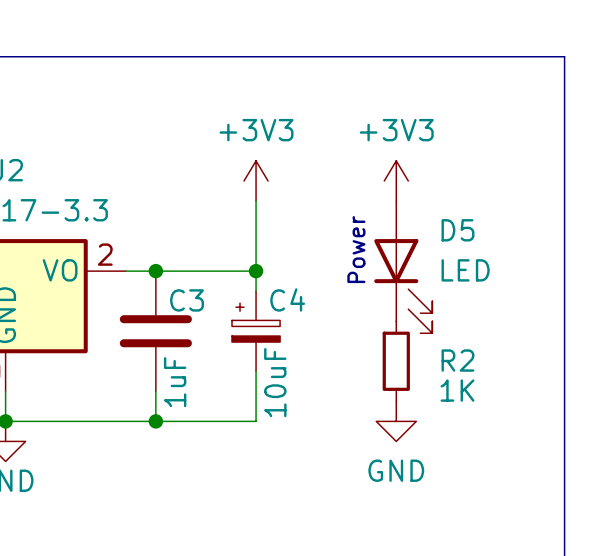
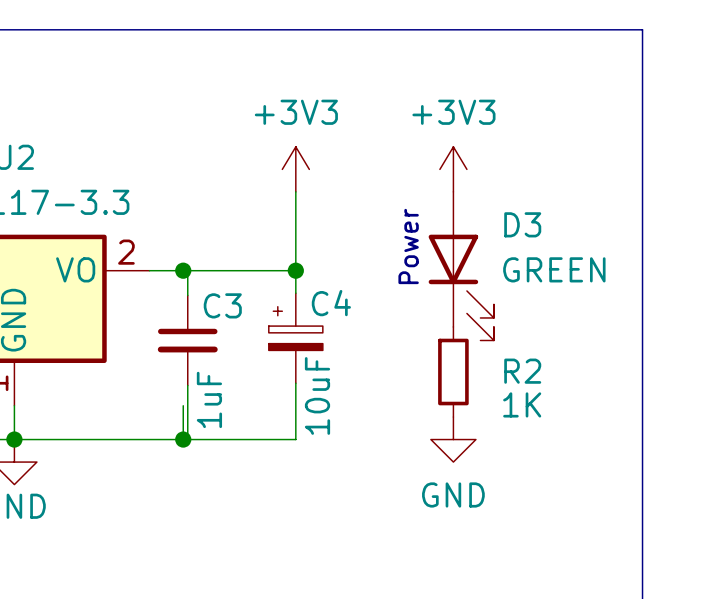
D5 name: D5 (457, 230) -> D3 (522, 224)
D5 value: LED (465, 270) -> GREEN (554, 269)
C3 symbol: [119, 271, 192, 392] -> [157, 295, 218, 386]
wire: none -> (187, 272) (187, 295)
wire: none -> (187, 385) (187, 444)

